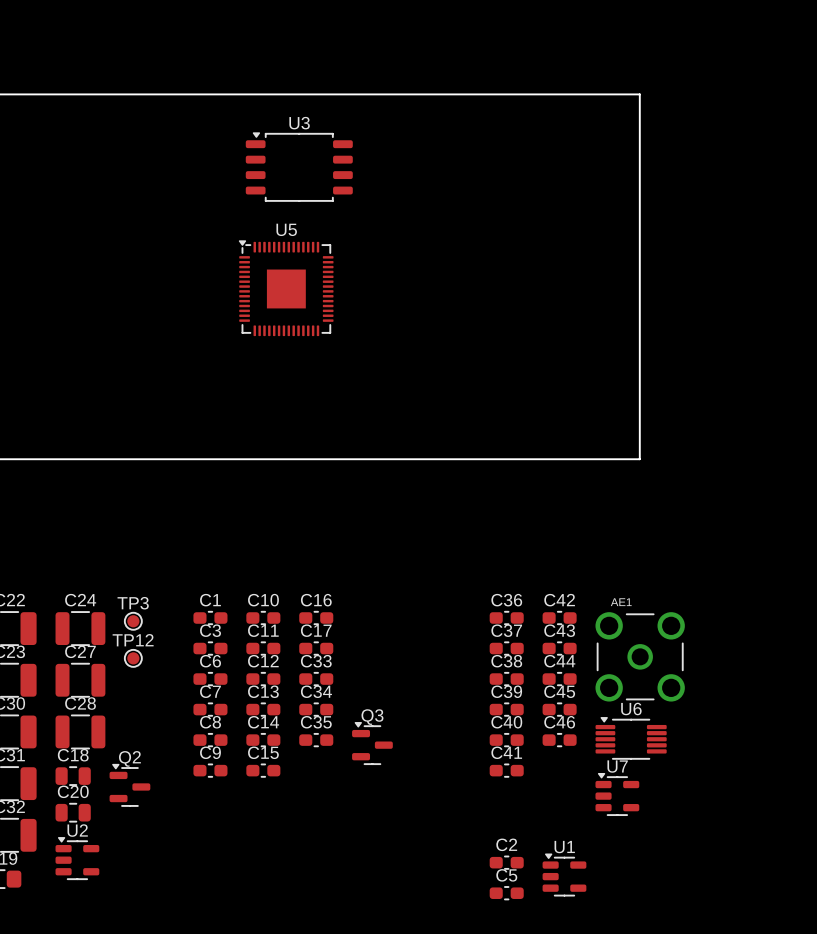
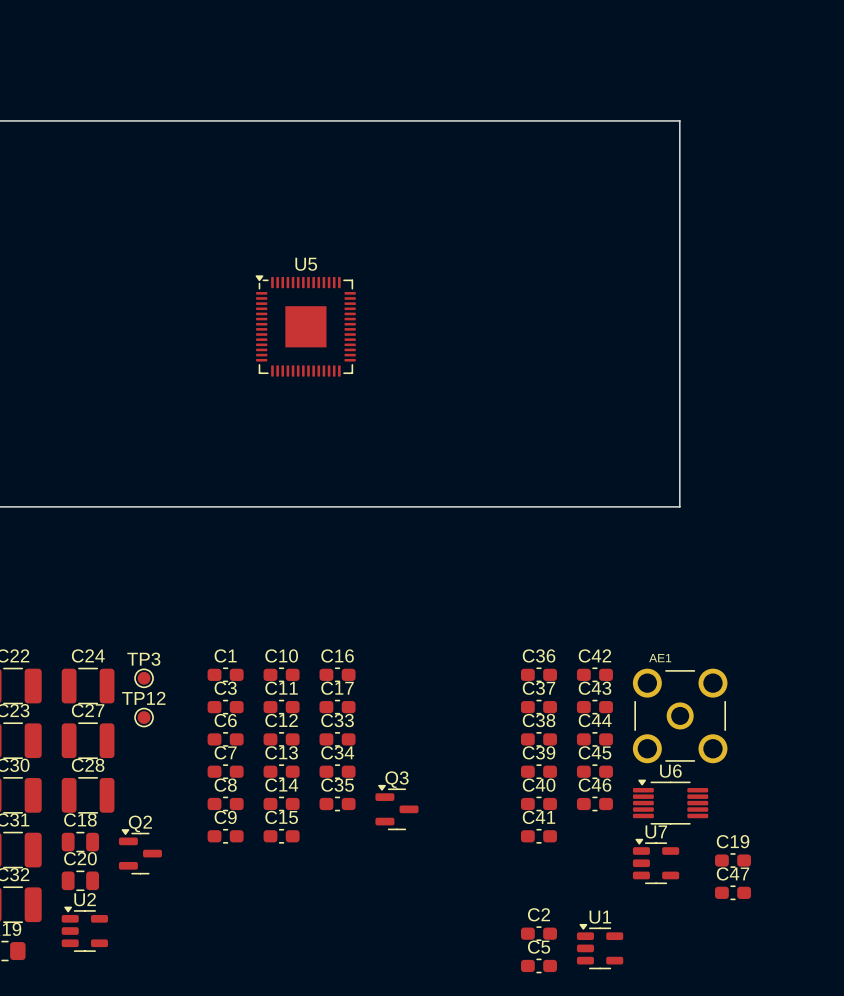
U3: (299, 167) -> none
C19: none -> (733, 860)
C47: none -> (733, 892)

